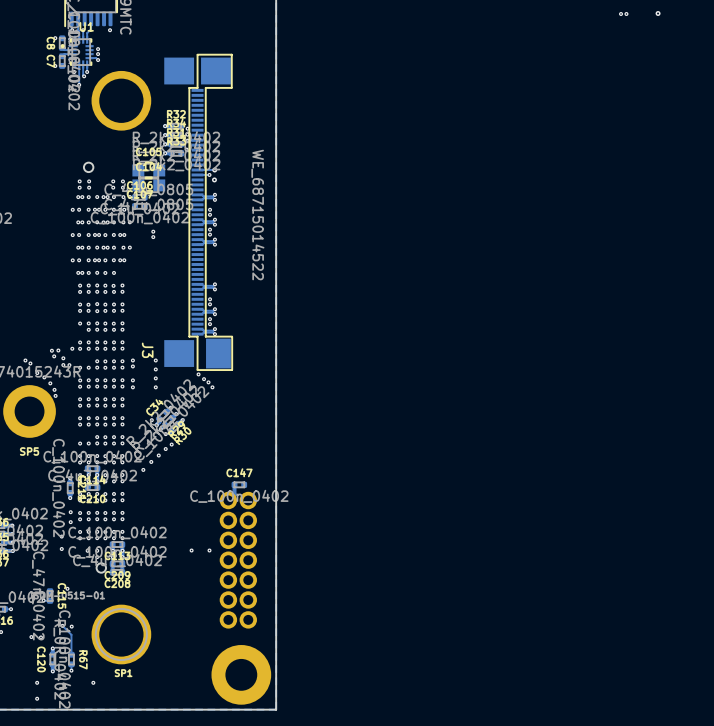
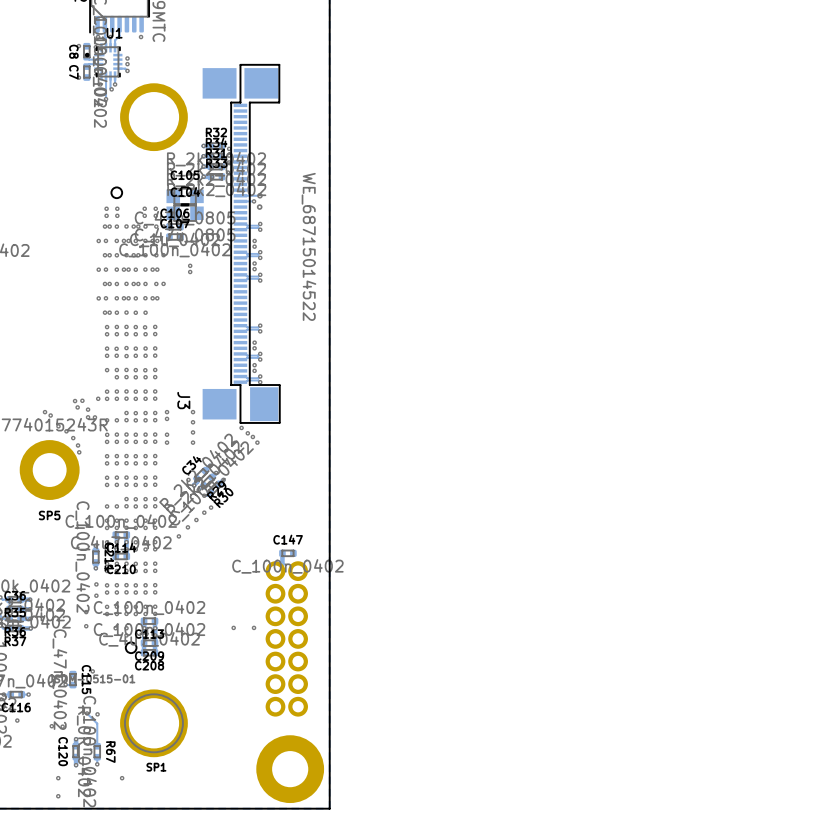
via: (658, 13) -> none
via: (621, 14) -> none
via: (626, 14) -> none

